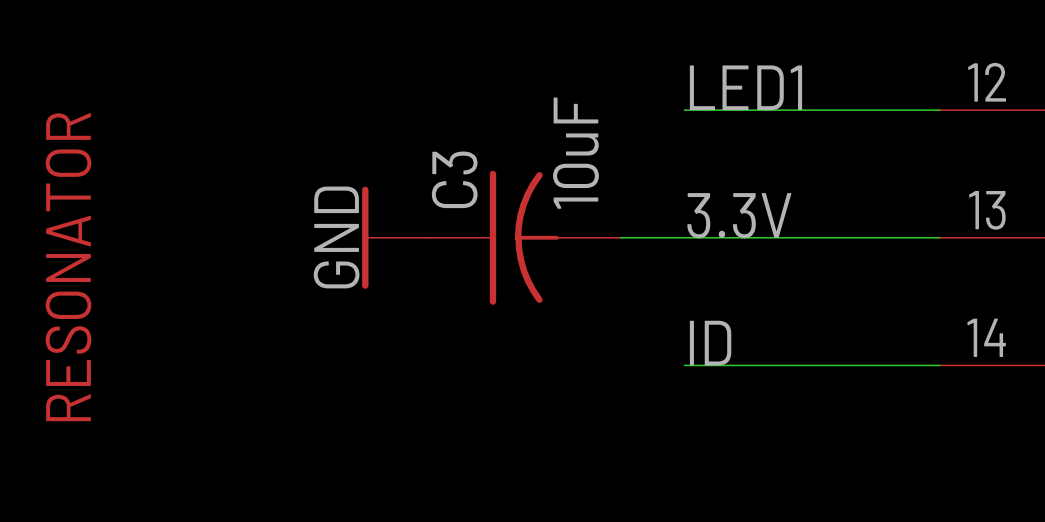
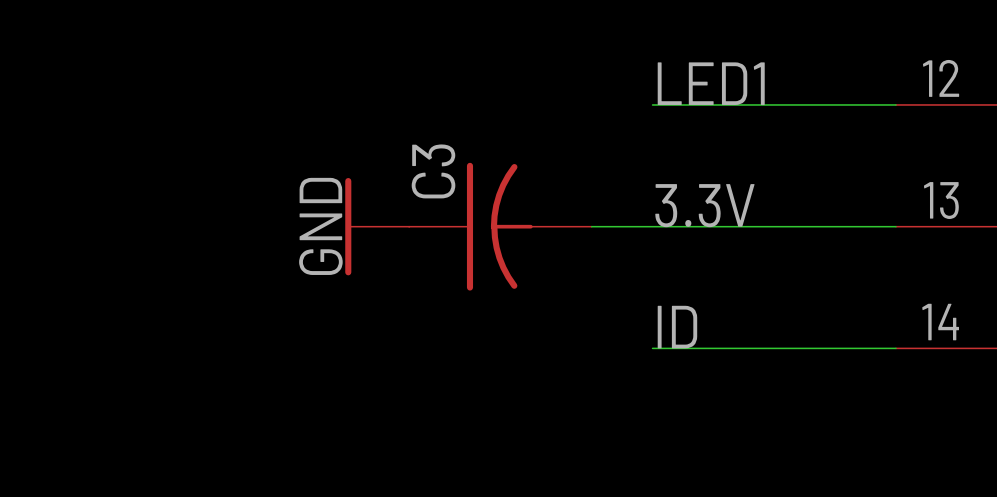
C3 value: 10uF (575, 153) -> none
part value: RESONATOR (68, 267) -> none

